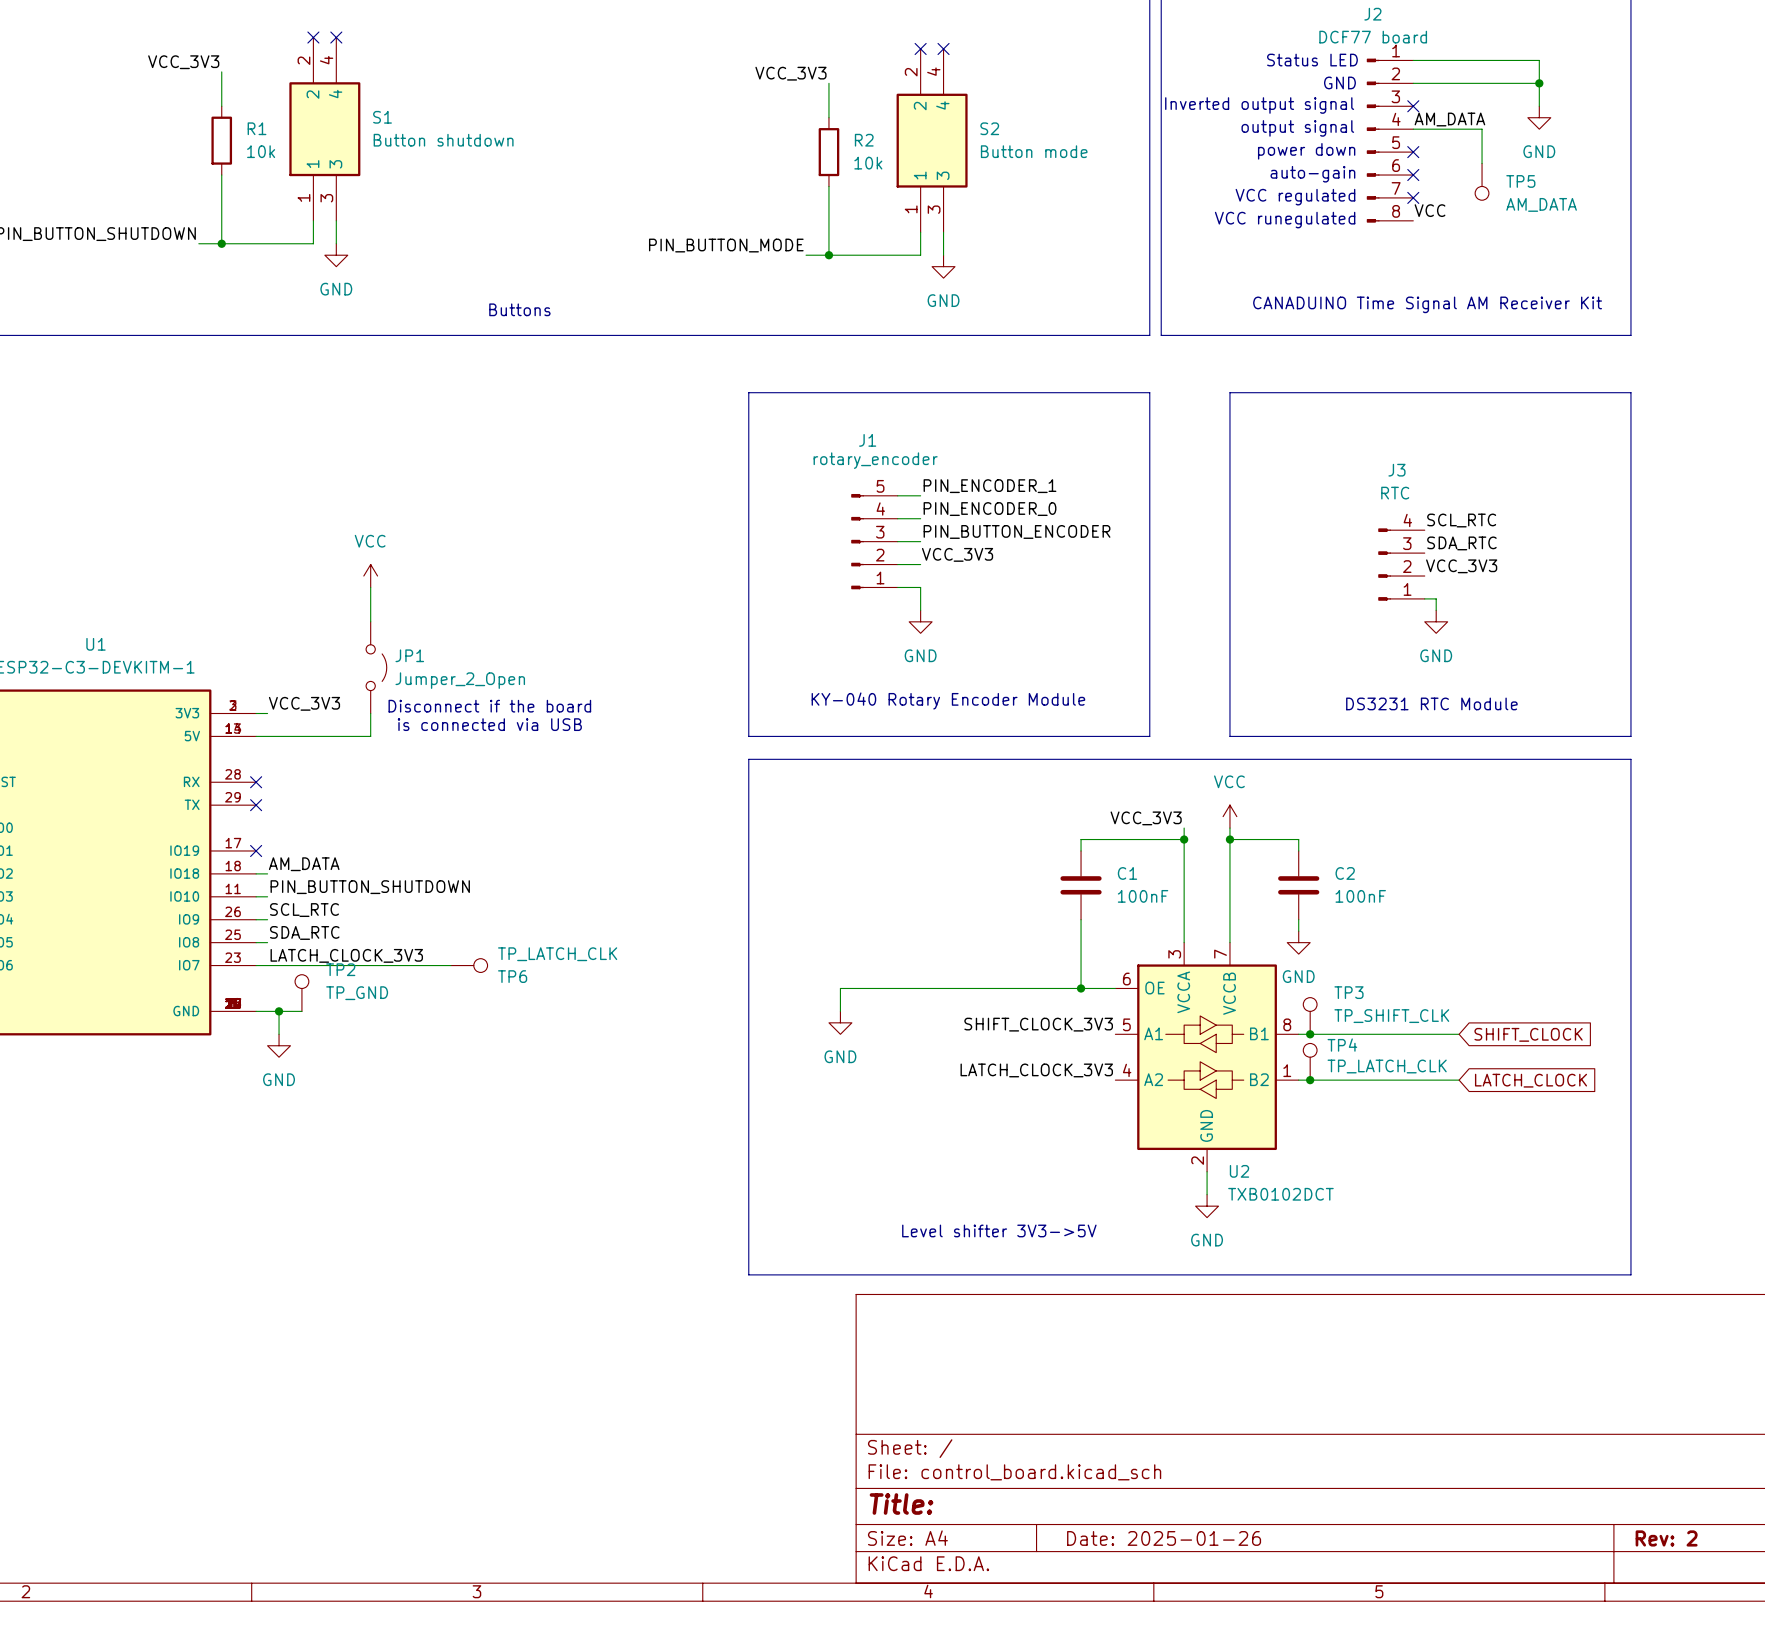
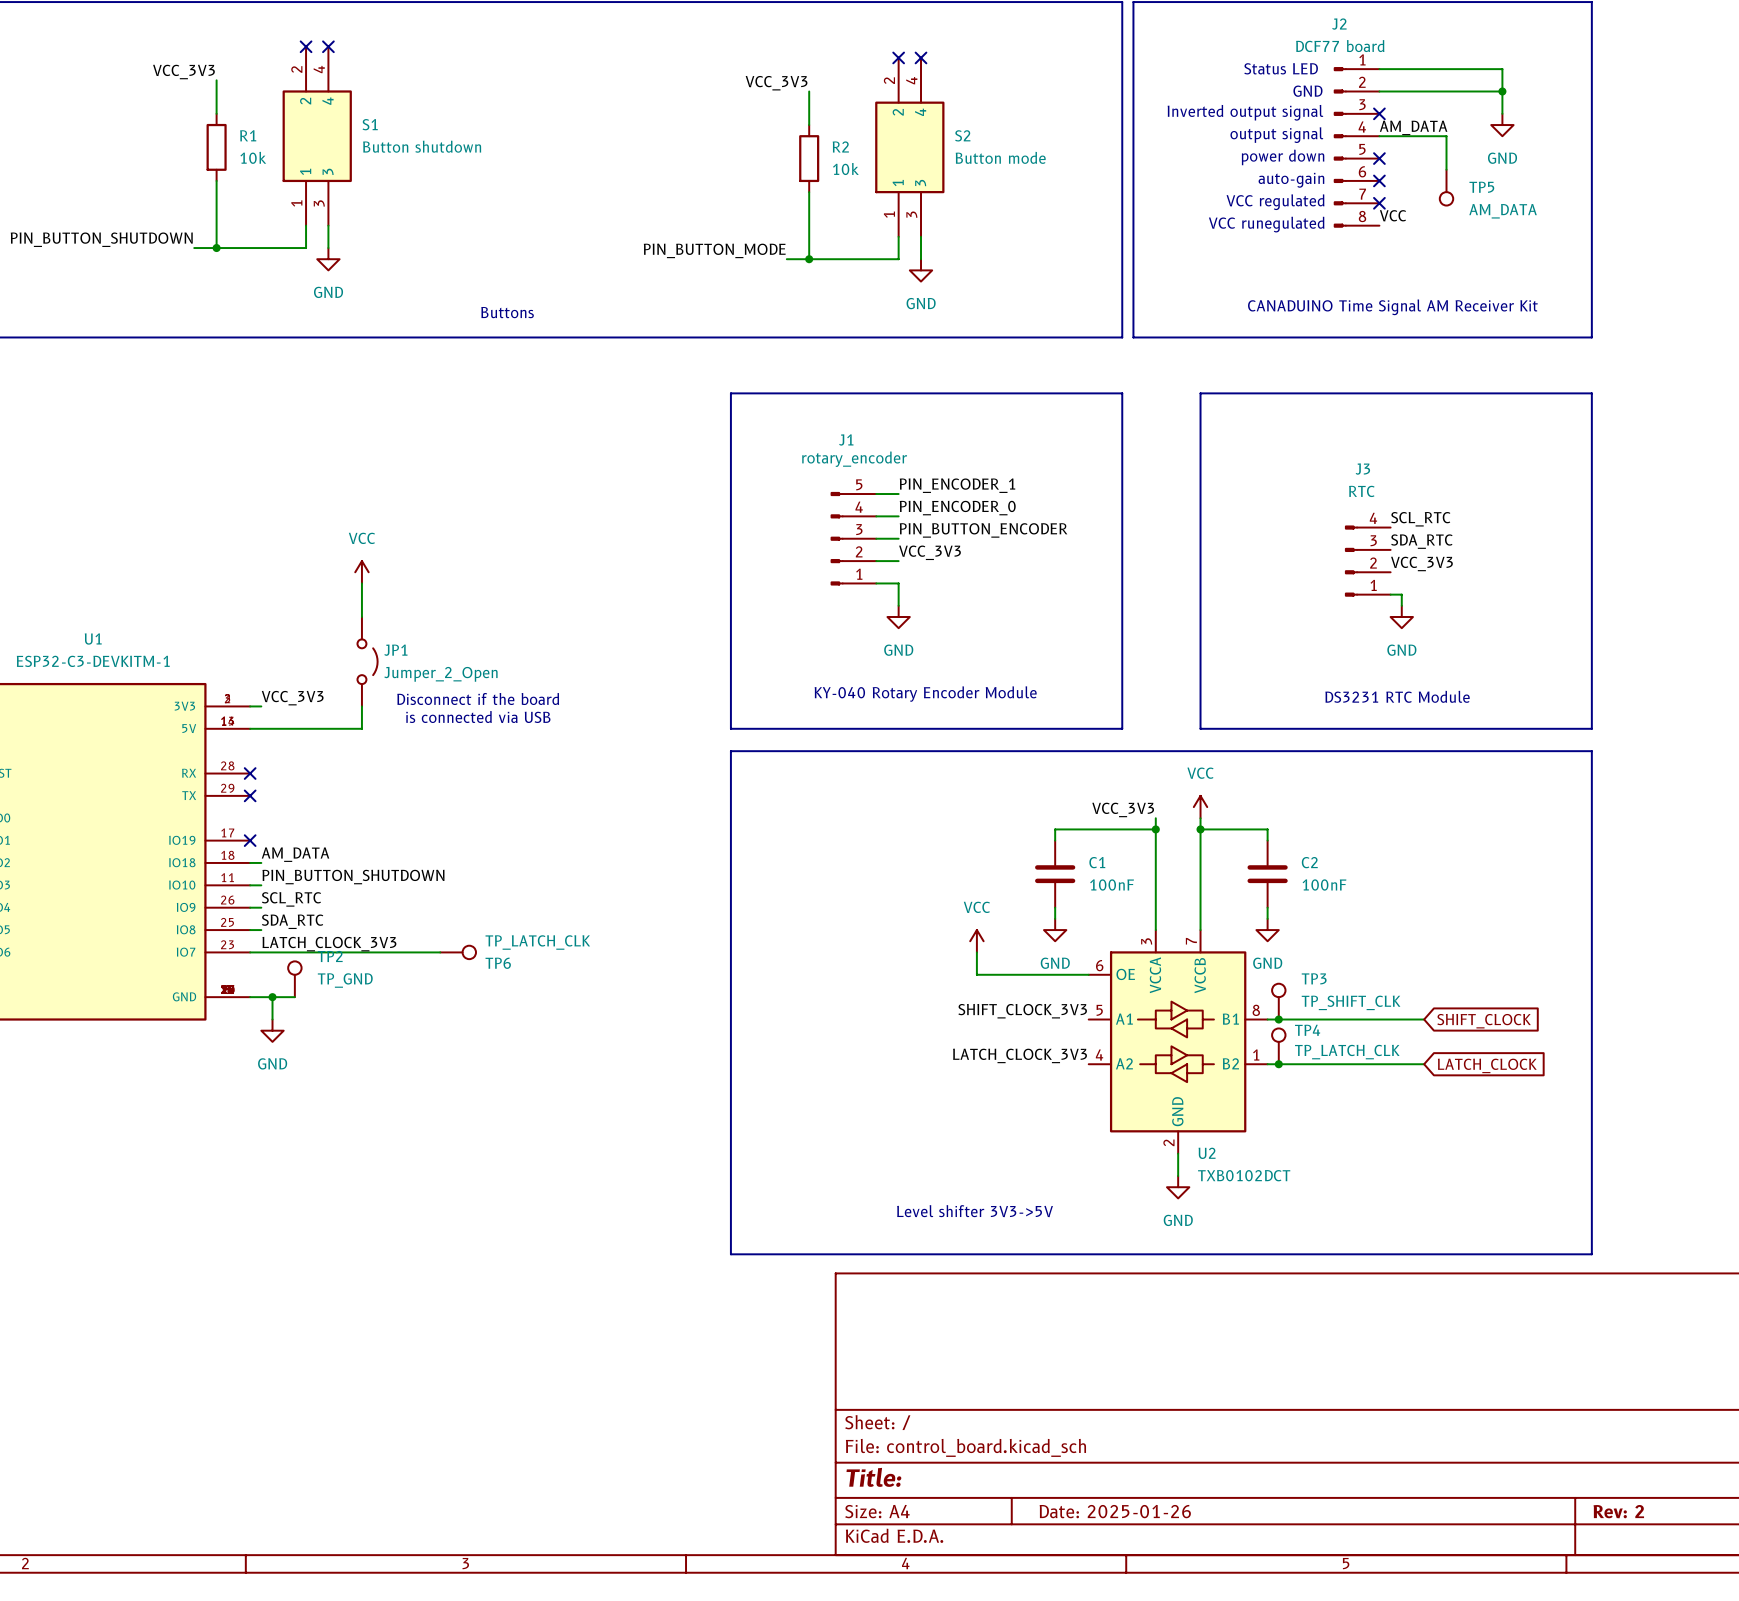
wire: (1081, 931) (1081, 988) -> none
power symbol: none -> GND (1055, 930)
power symbol: none -> VCC (976, 941)
wire: (1000, 988) (840, 988) (840, 1011) -> (976, 974) (976, 952)
junction: (1081, 988) -> none
power symbol: GND (840, 1022) -> none

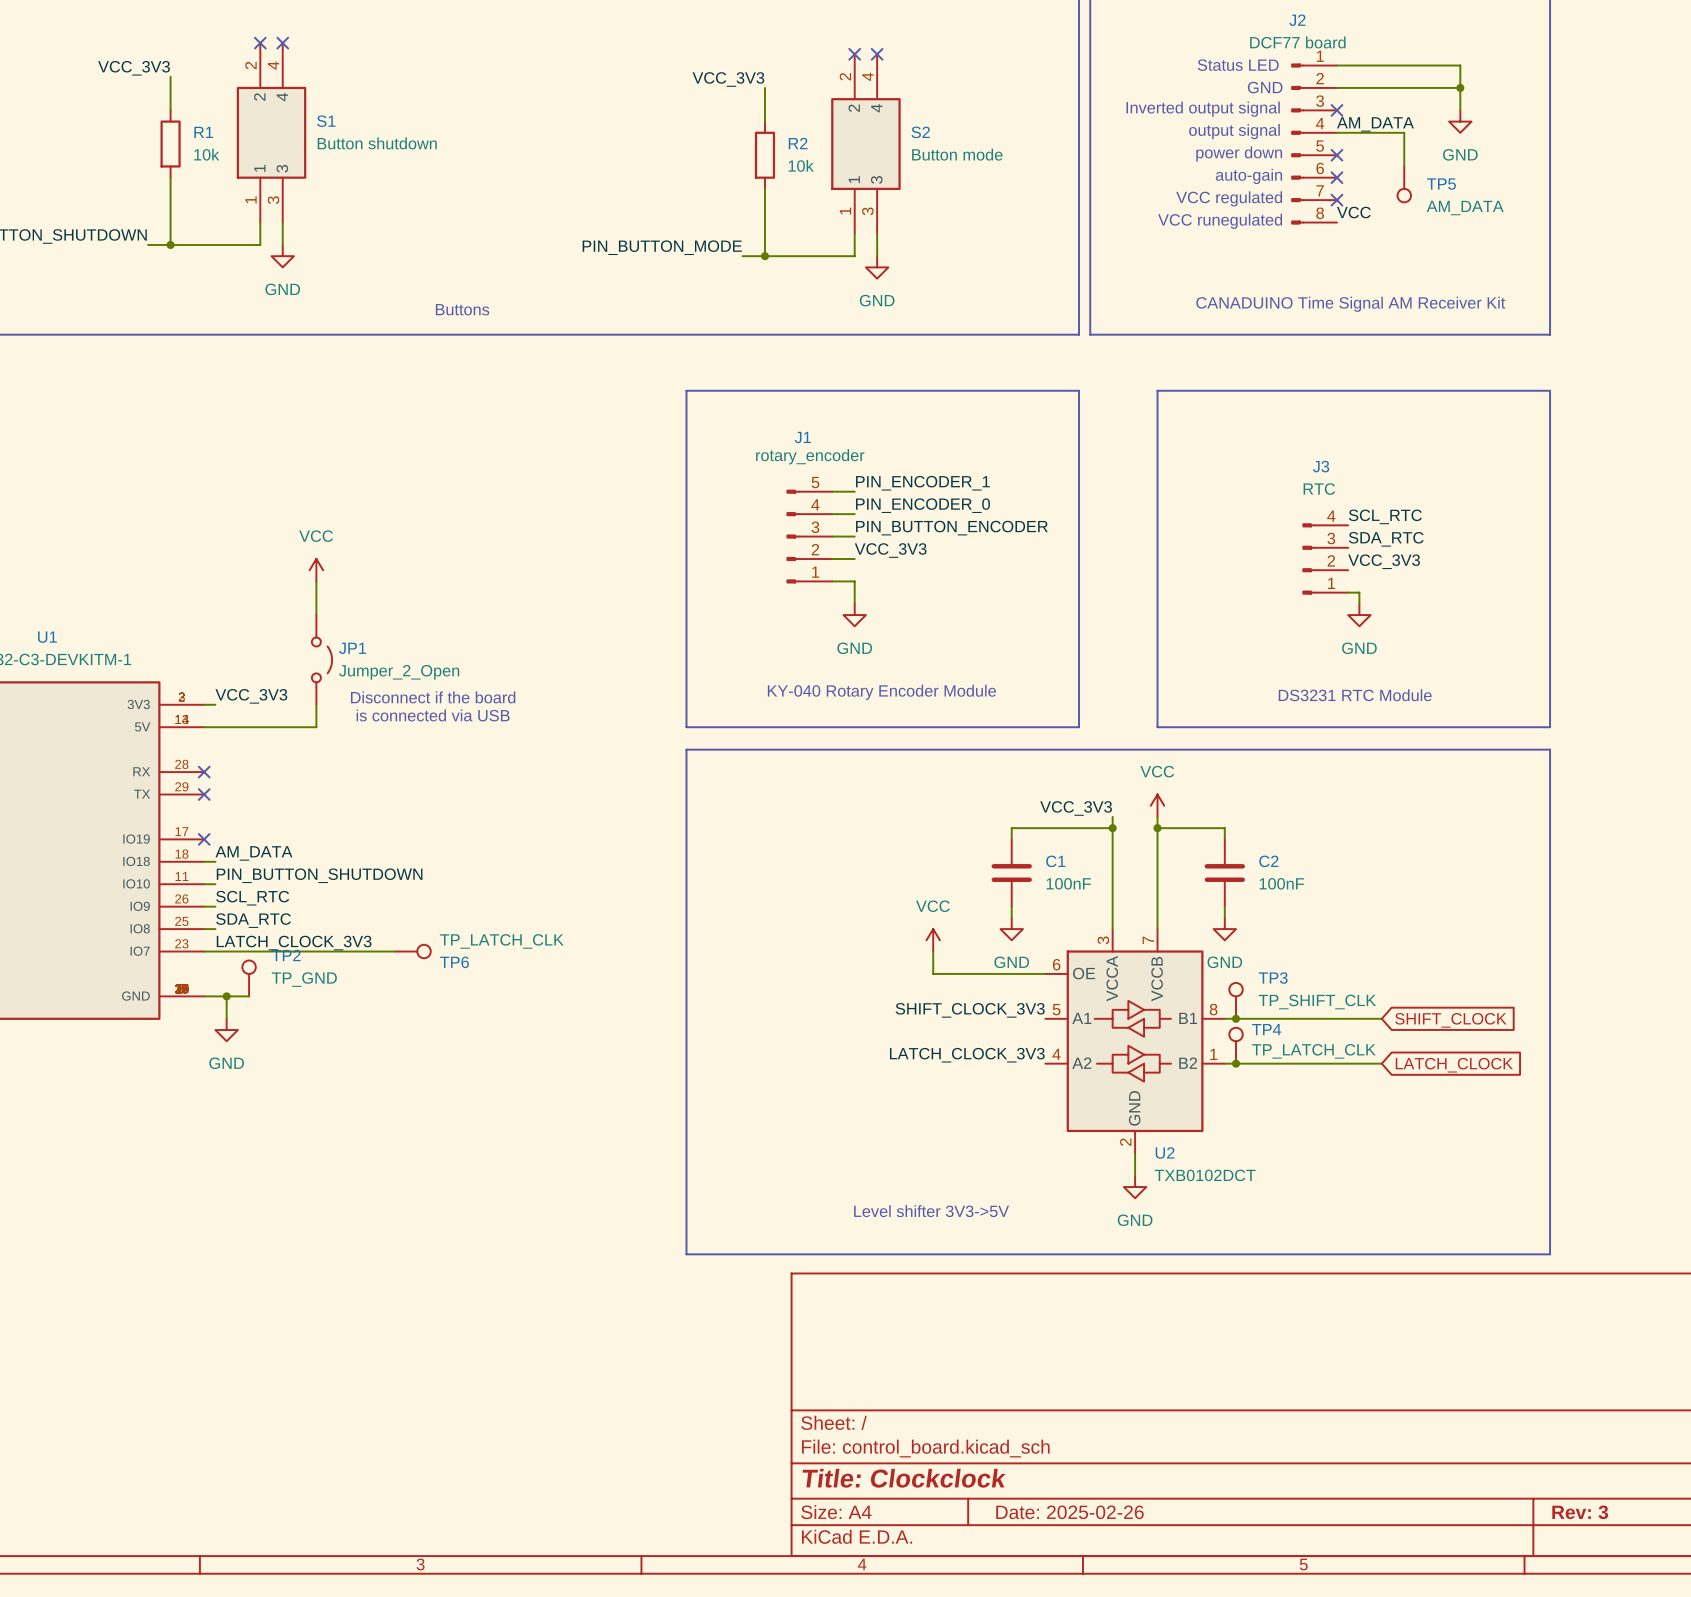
title block: Title: (873, 1477) -> Title: Clockclock (904, 1478)
title block: Date: 2025-01-26 (1115, 1511) -> Date: 2025-02-26 (1069, 1512)
title block: Rev: 2 (1618, 1511) -> Rev: 3 (1580, 1512)

